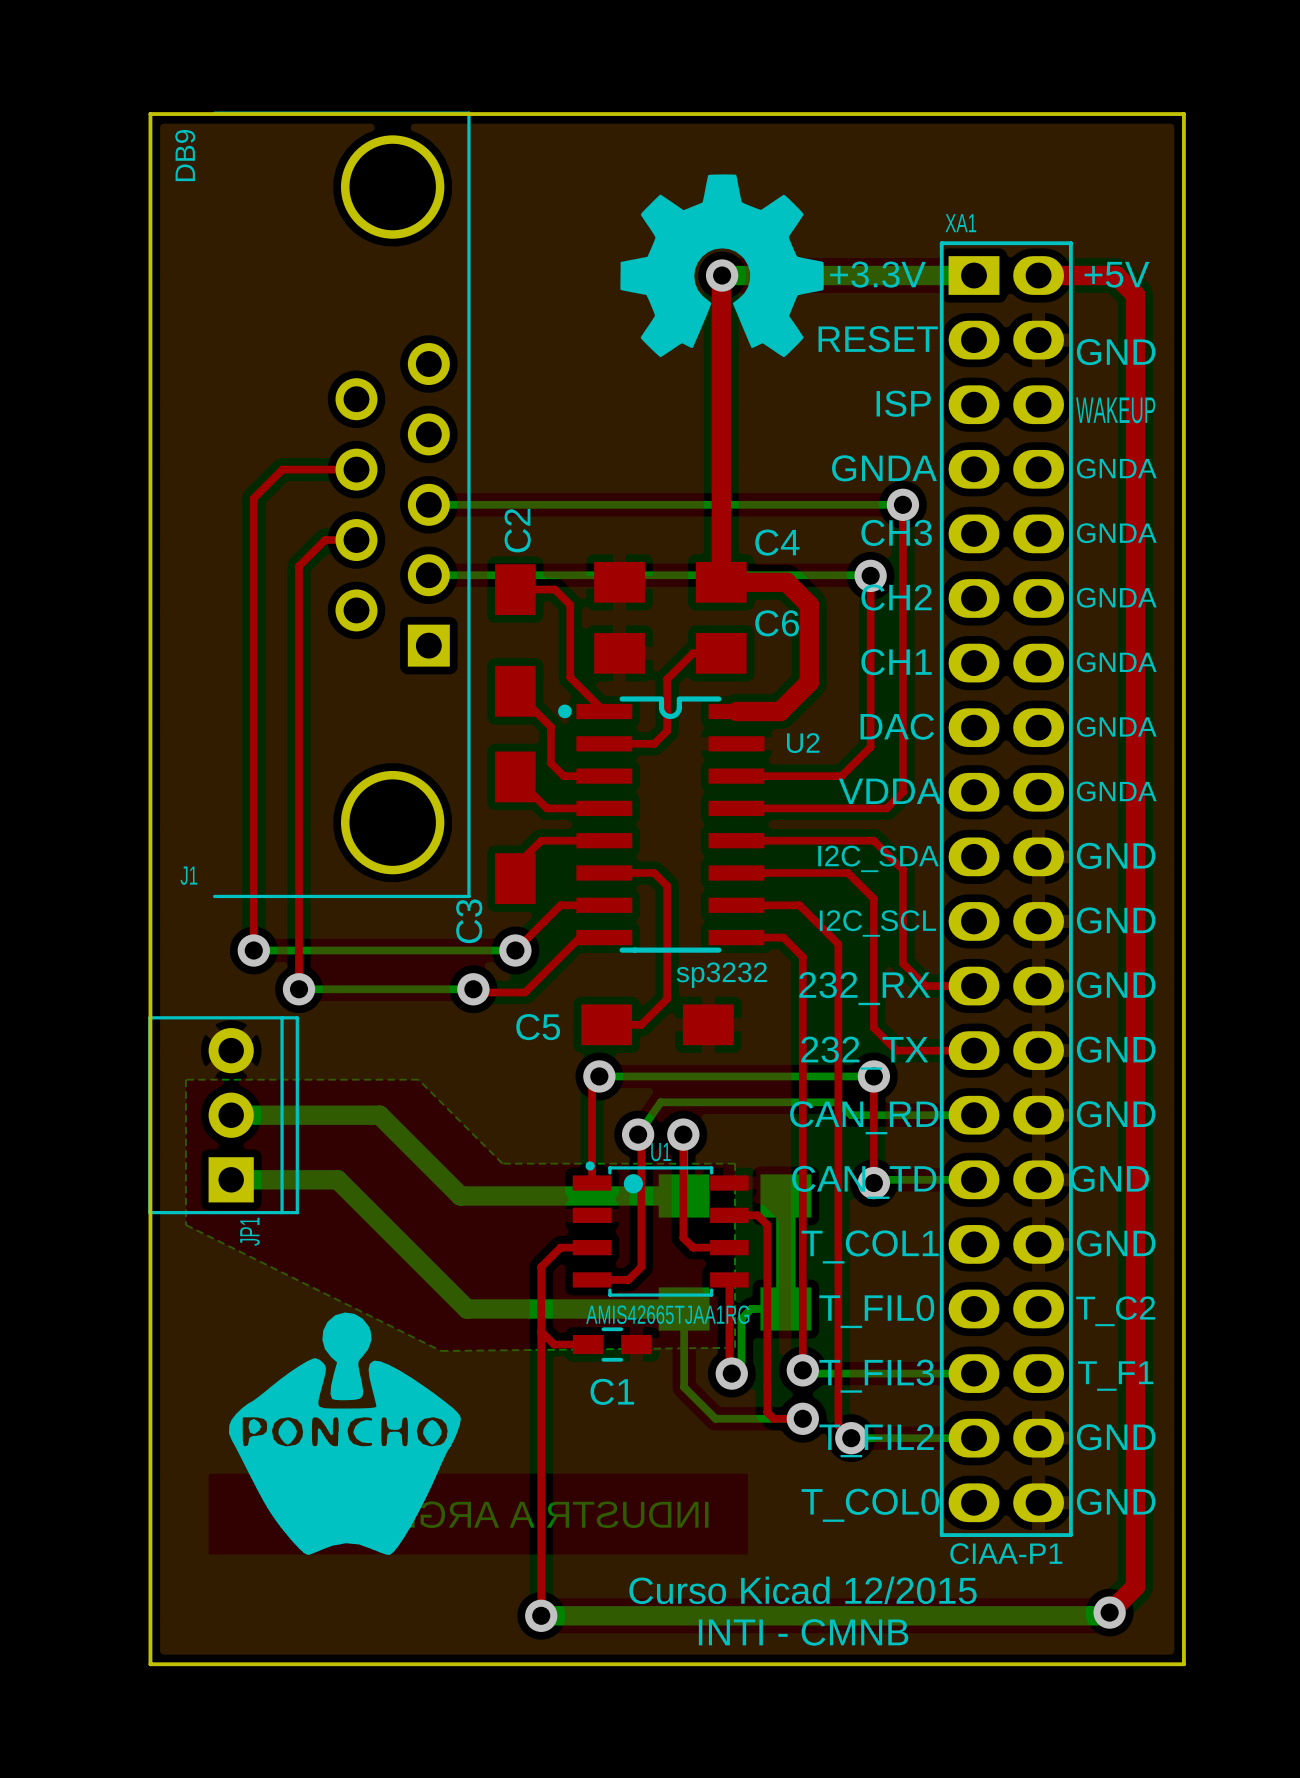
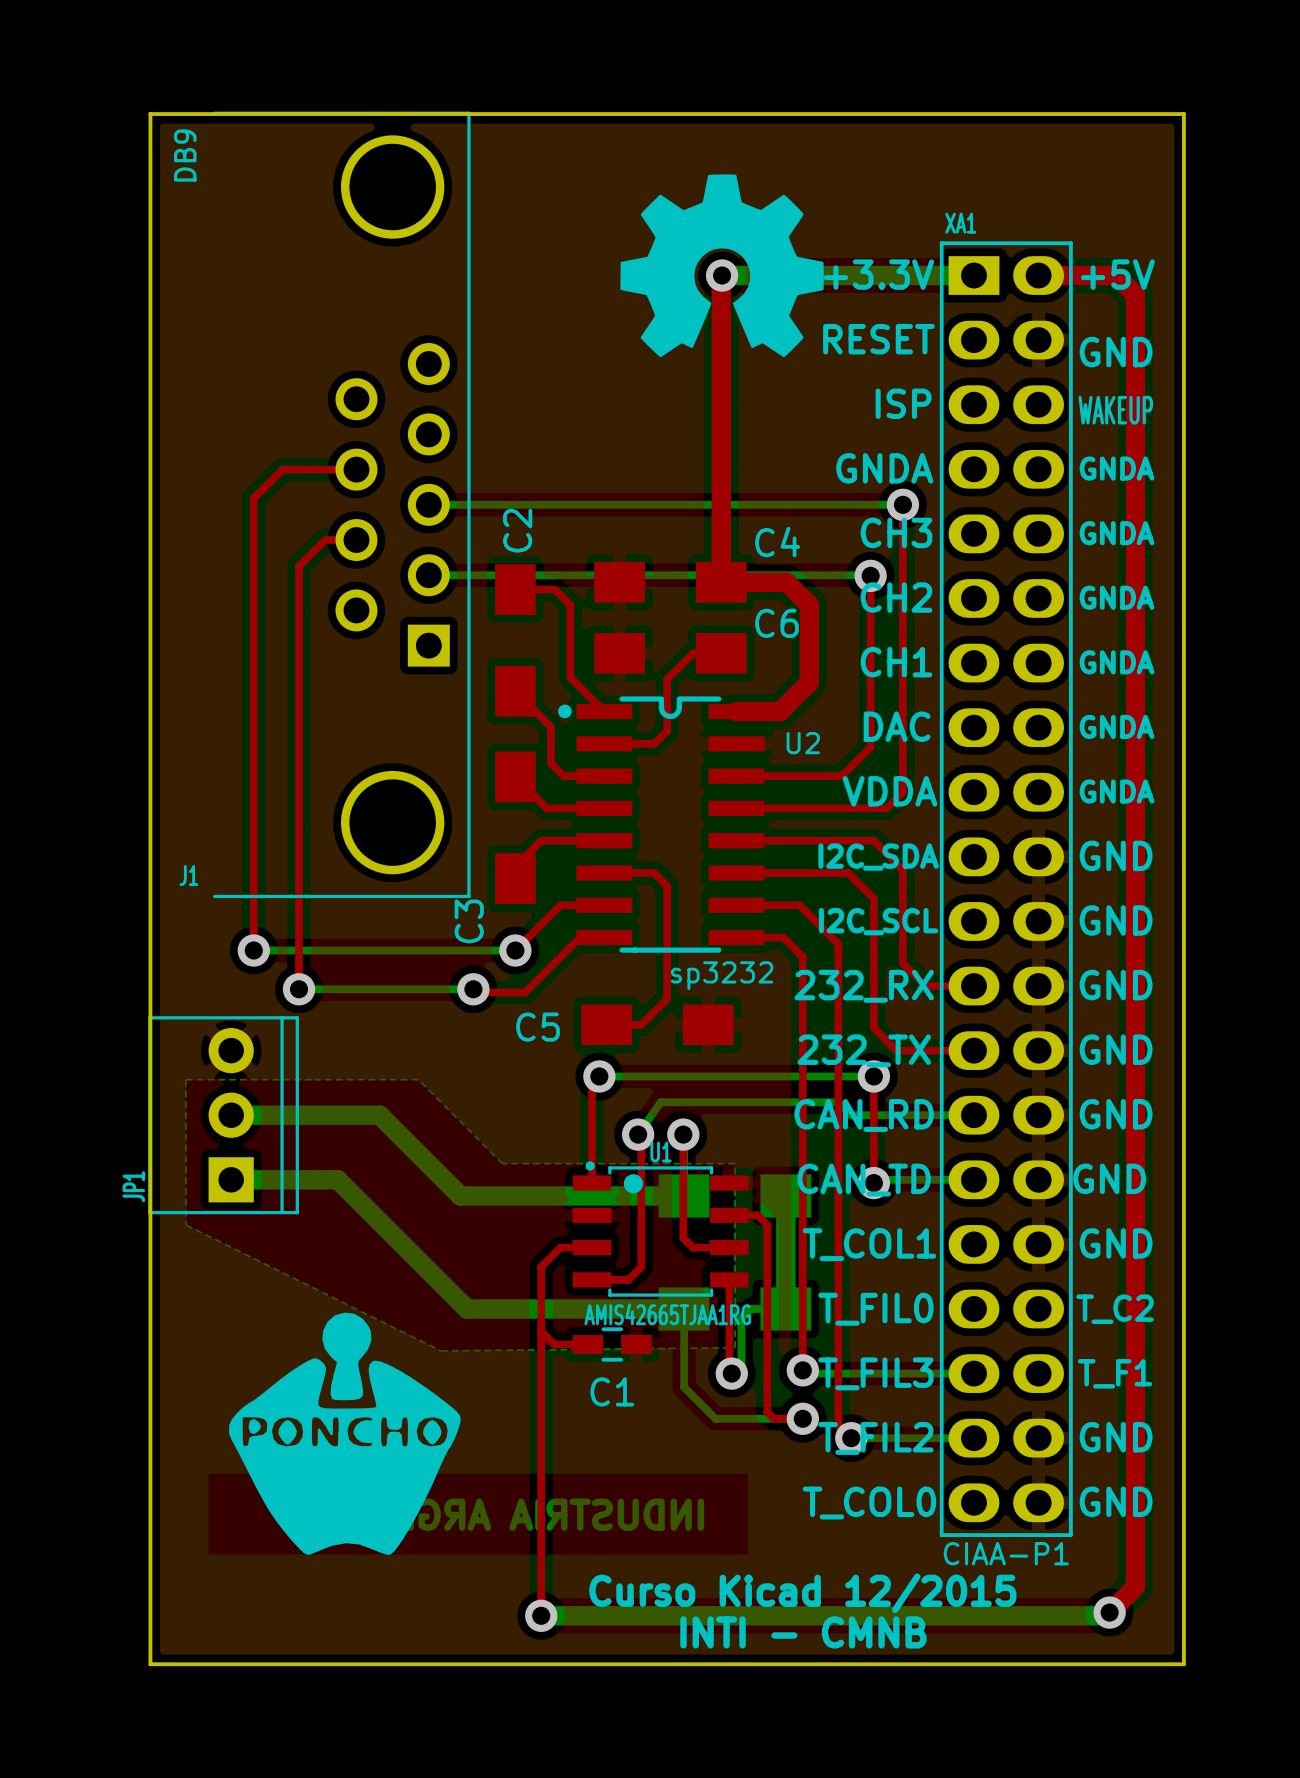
JP1 name position: JP1 (249, 1231) -> JP1 (133, 1186)

